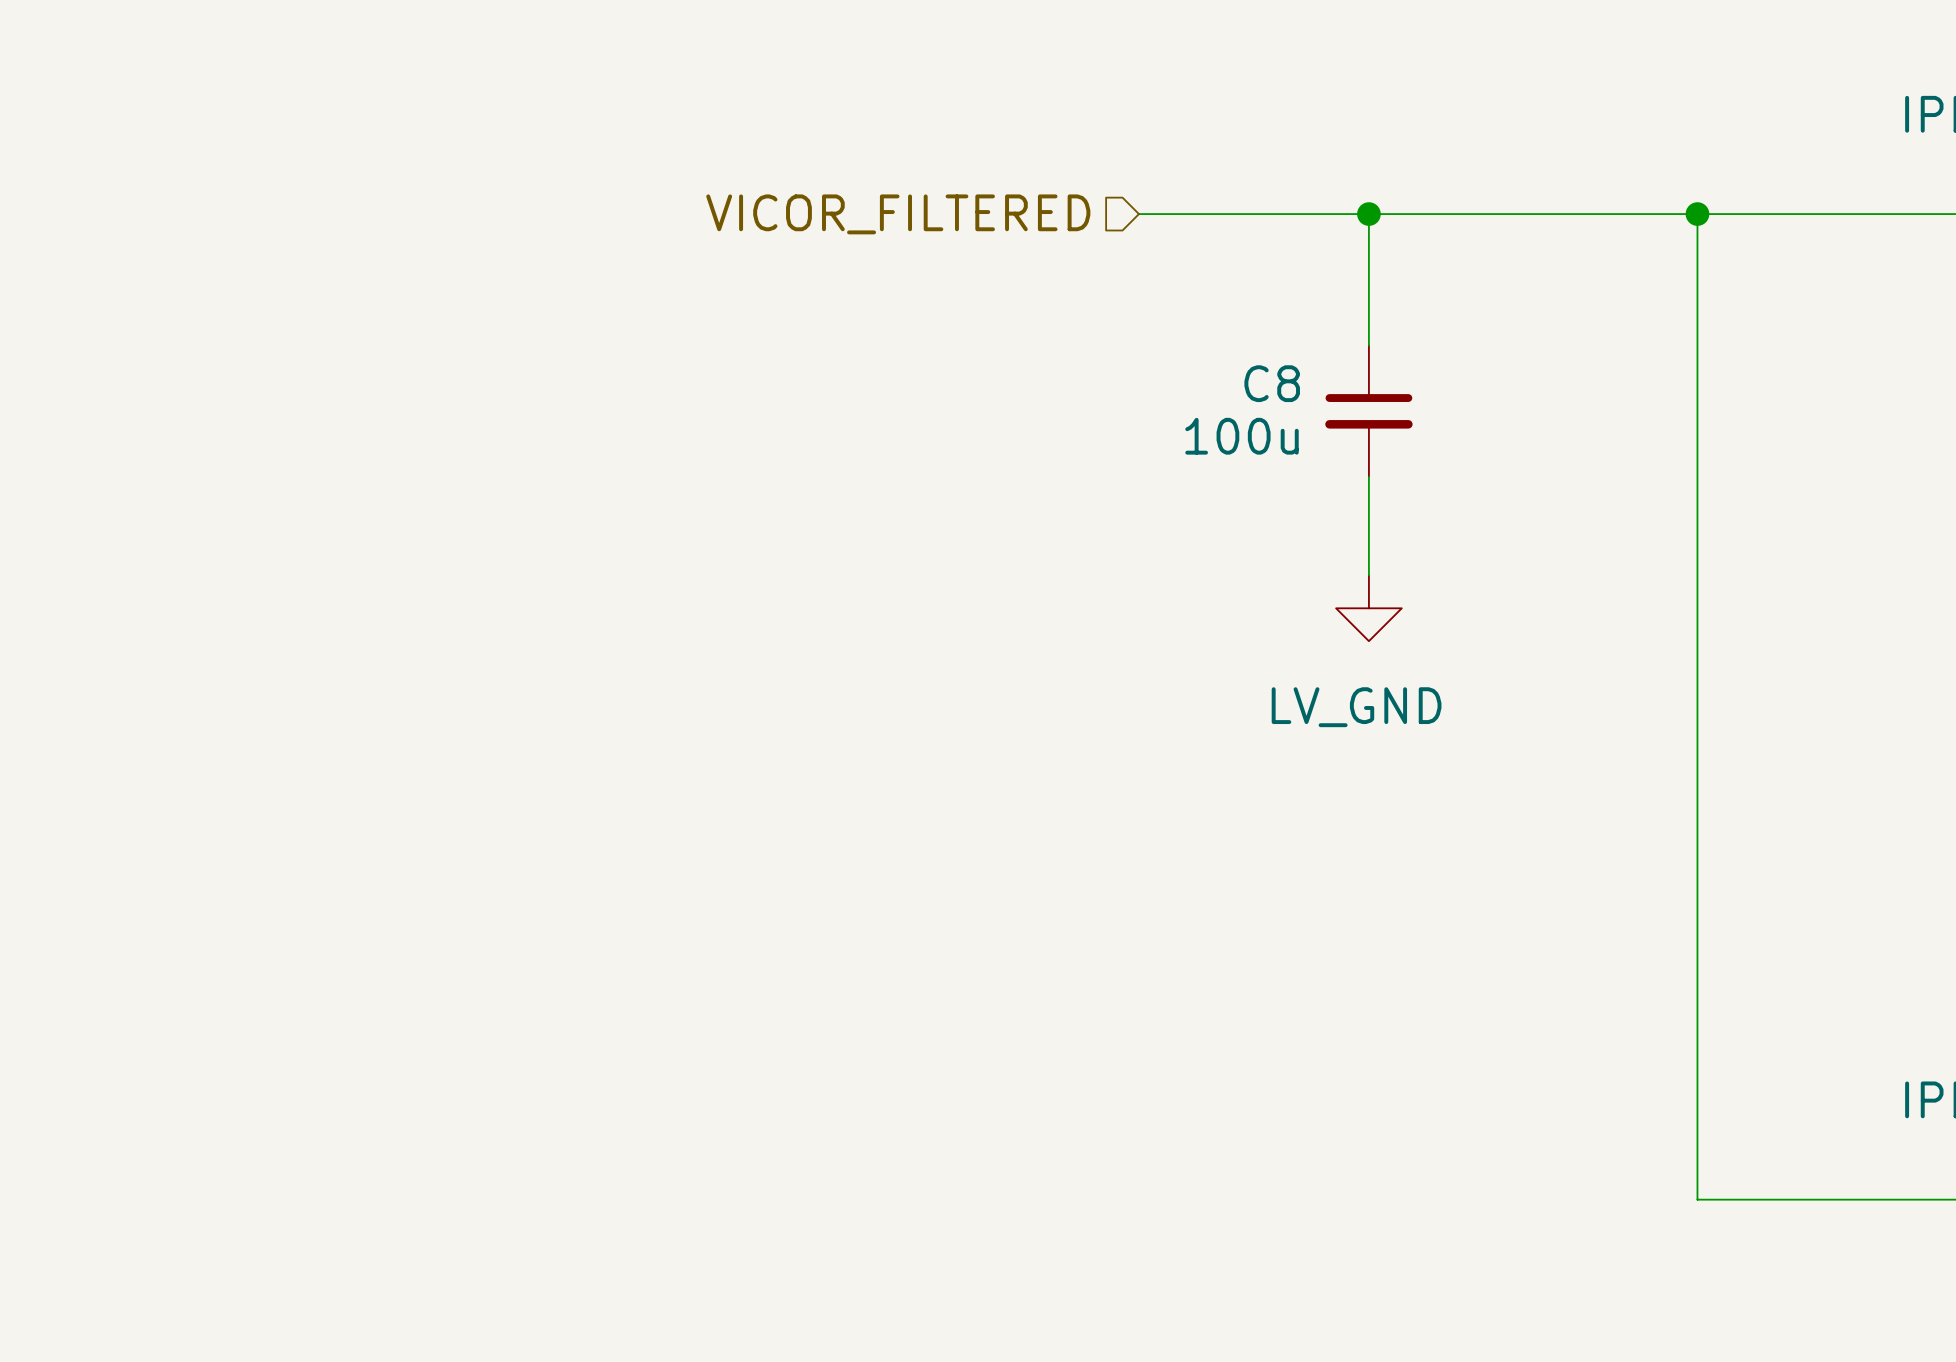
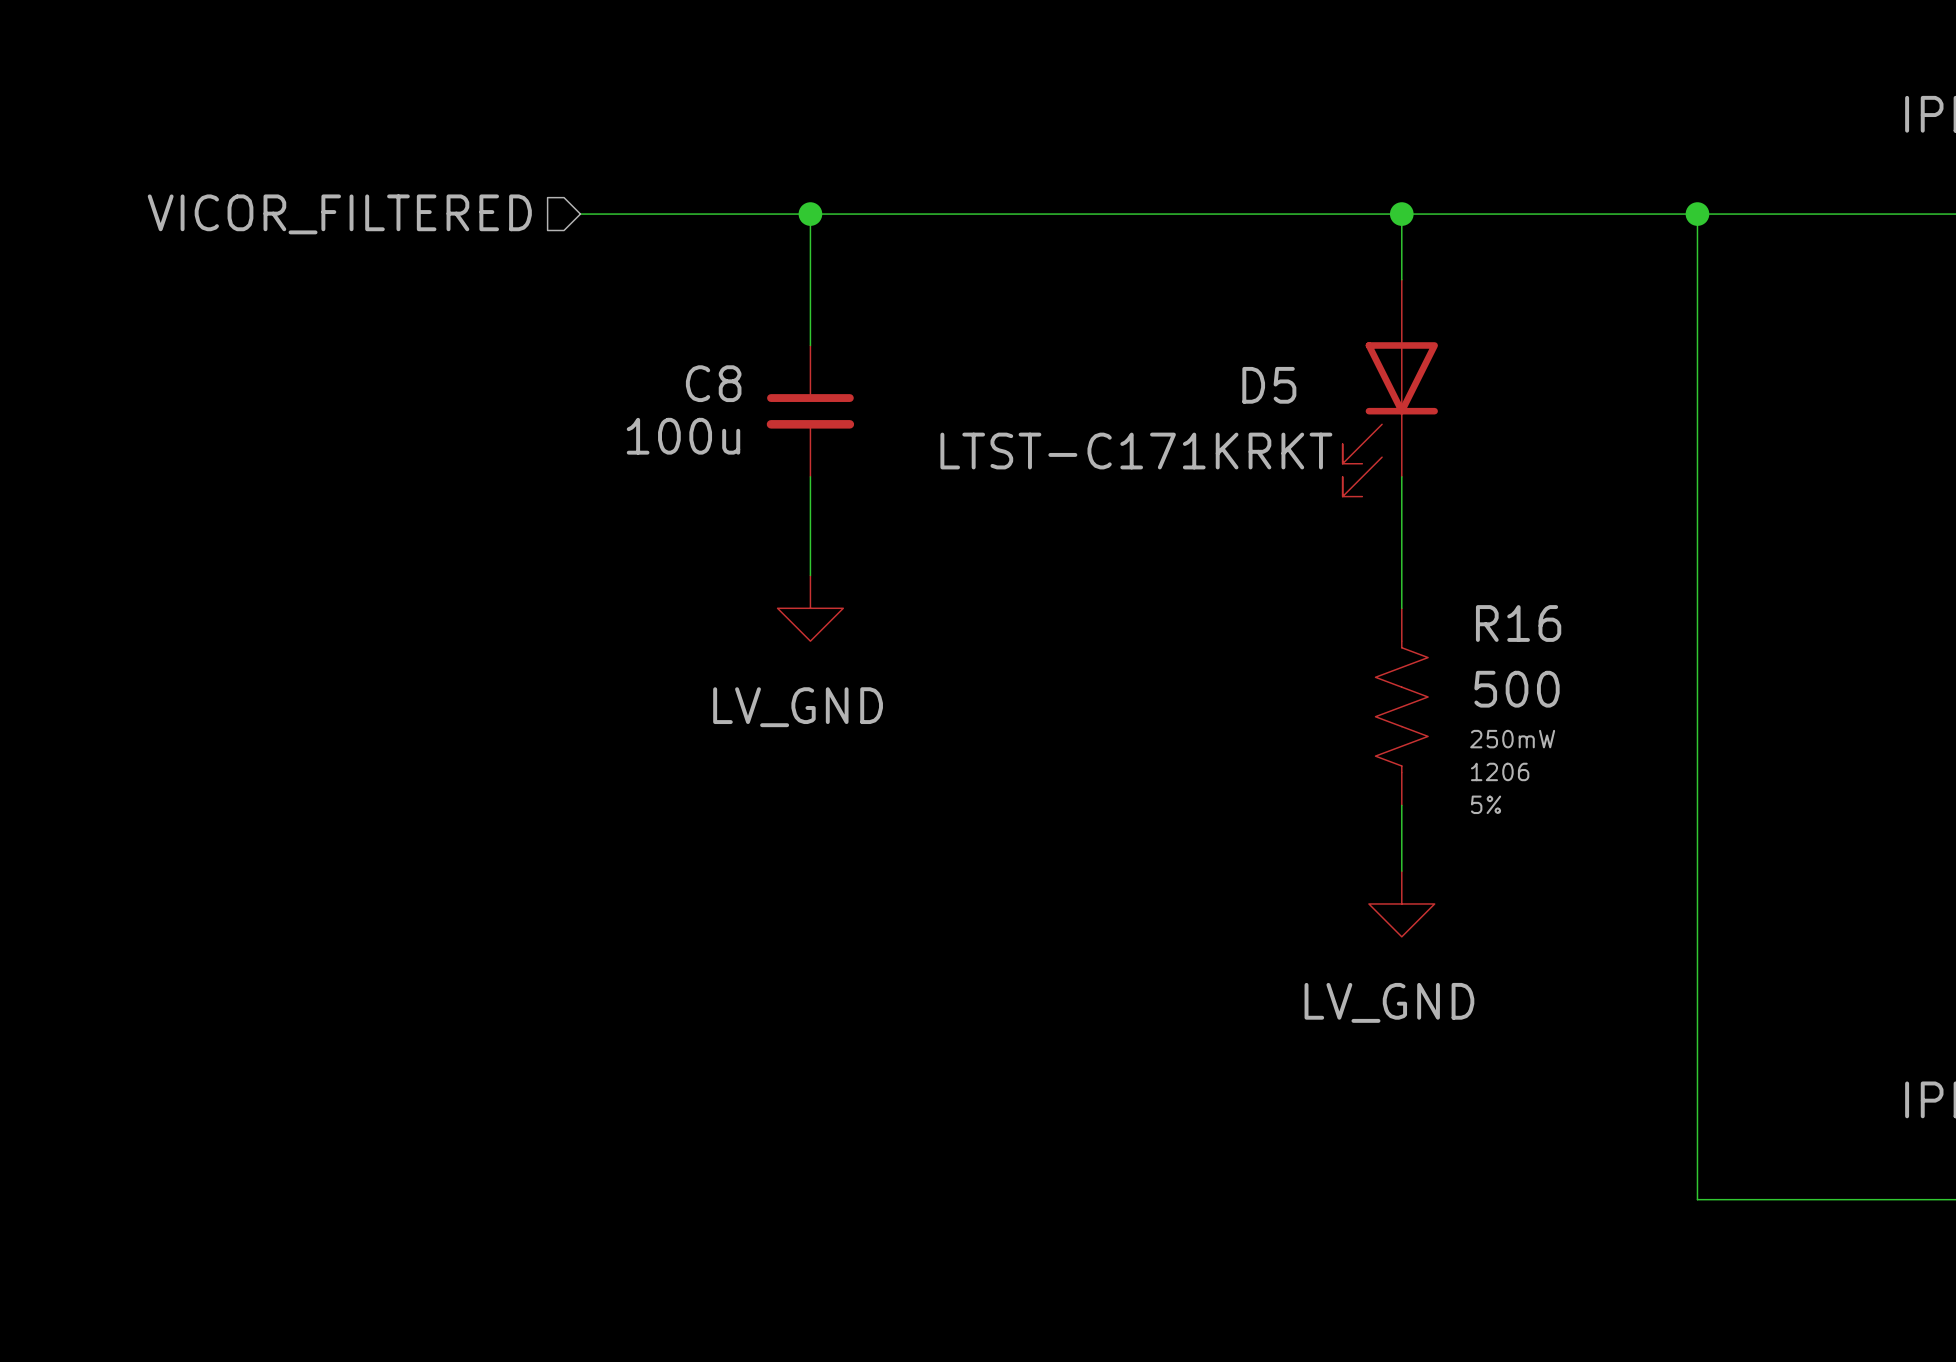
wire: none -> (580, 214) (1138, 214)
junction: none -> (810, 214)
hierarchical label position: VICOR_FILTERED (898, 214) -> VICOR_FILTERED (339, 214)
wire: (1368, 214) (1368, 345) -> (810, 214) (810, 345)
junction position: (1368, 214) -> (1401, 214)
wire: none -> (1401, 214) (1401, 279)
D5: none -> LTST-C171KRKT (1390, 388)
C8 position: (1368, 411) -> (810, 411)
wire: (1368, 476) (1368, 575) -> (810, 476) (810, 575)
wire: none -> (1401, 476) (1401, 608)
power symbol: none -> LV_GND (810, 608)
power symbol: LV_GND (1368, 608) -> none
R16: none -> 500 (1401, 706)
wire: none -> (1401, 805) (1401, 871)
power symbol: none -> LV_GND (1401, 903)

